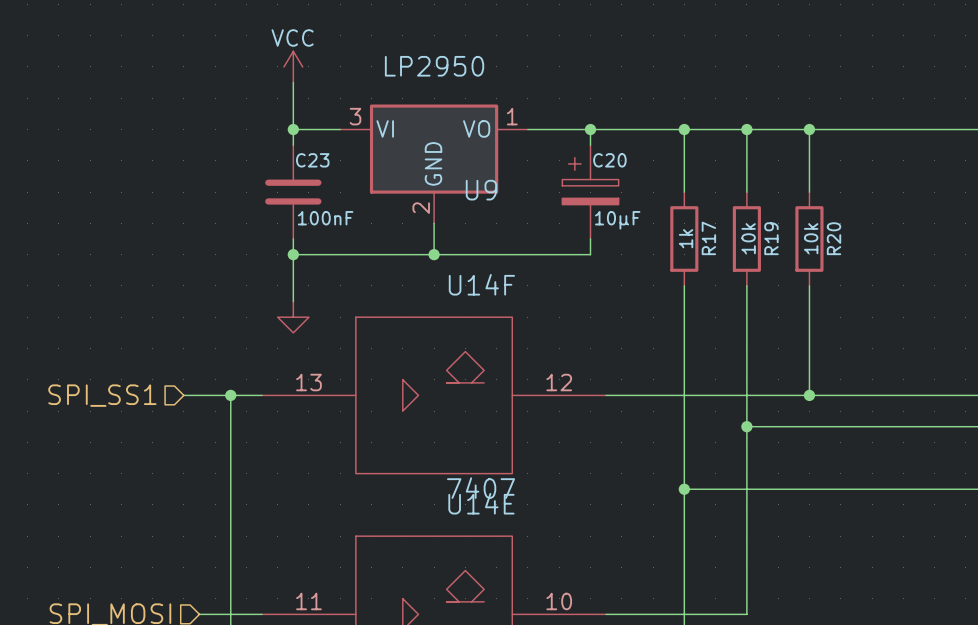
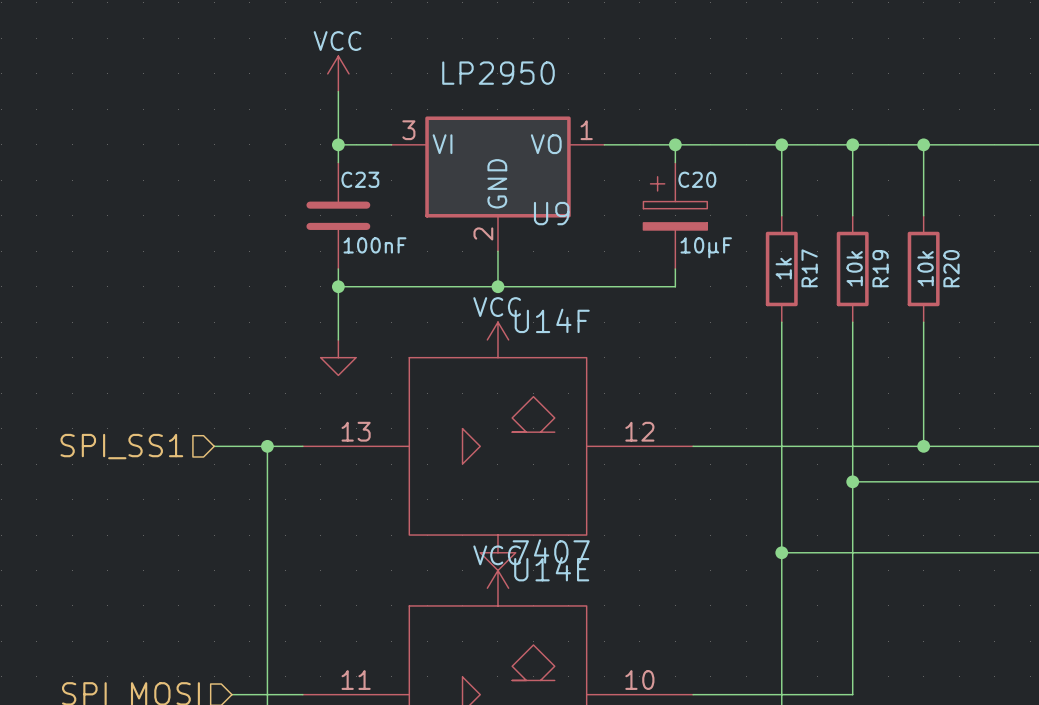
power symbol: none -> VCC (497, 339)
power symbol: none -> (497, 552)
power symbol: none -> VCC (497, 588)

